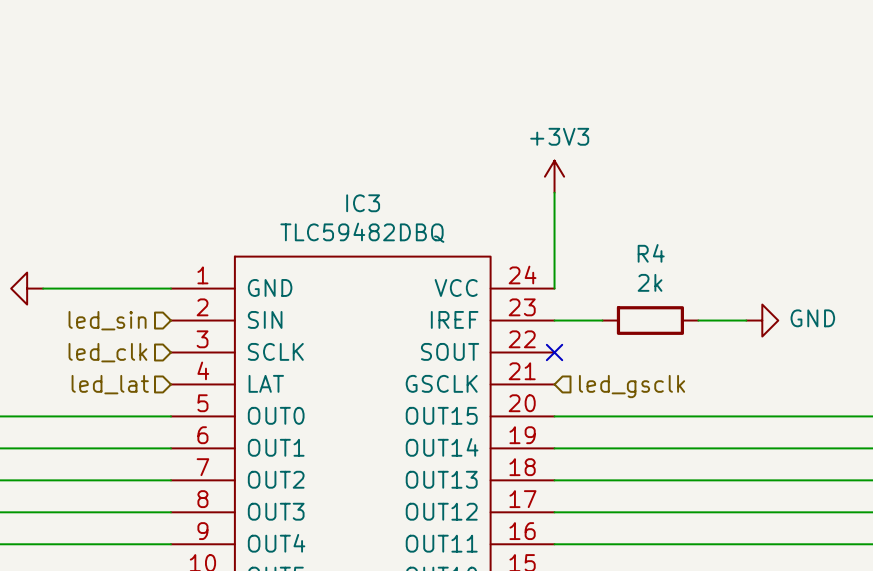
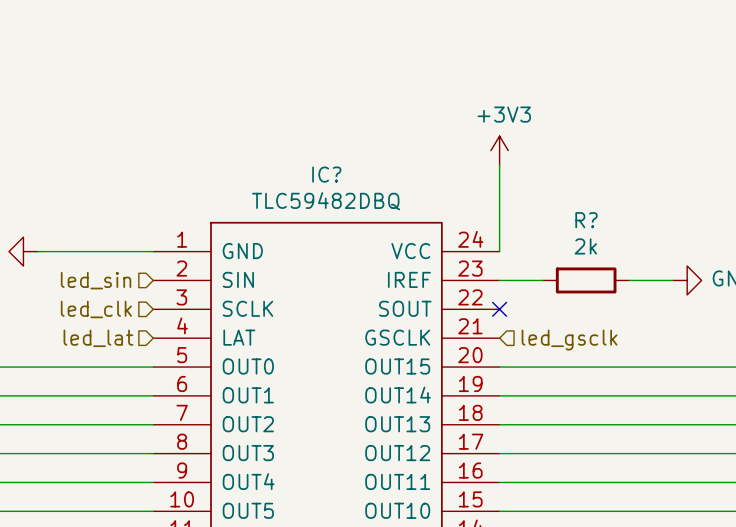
IC3 name: IC3 (363, 203) -> IC? (326, 174)
R4 name: R4 (651, 253) -> R? (586, 220)

